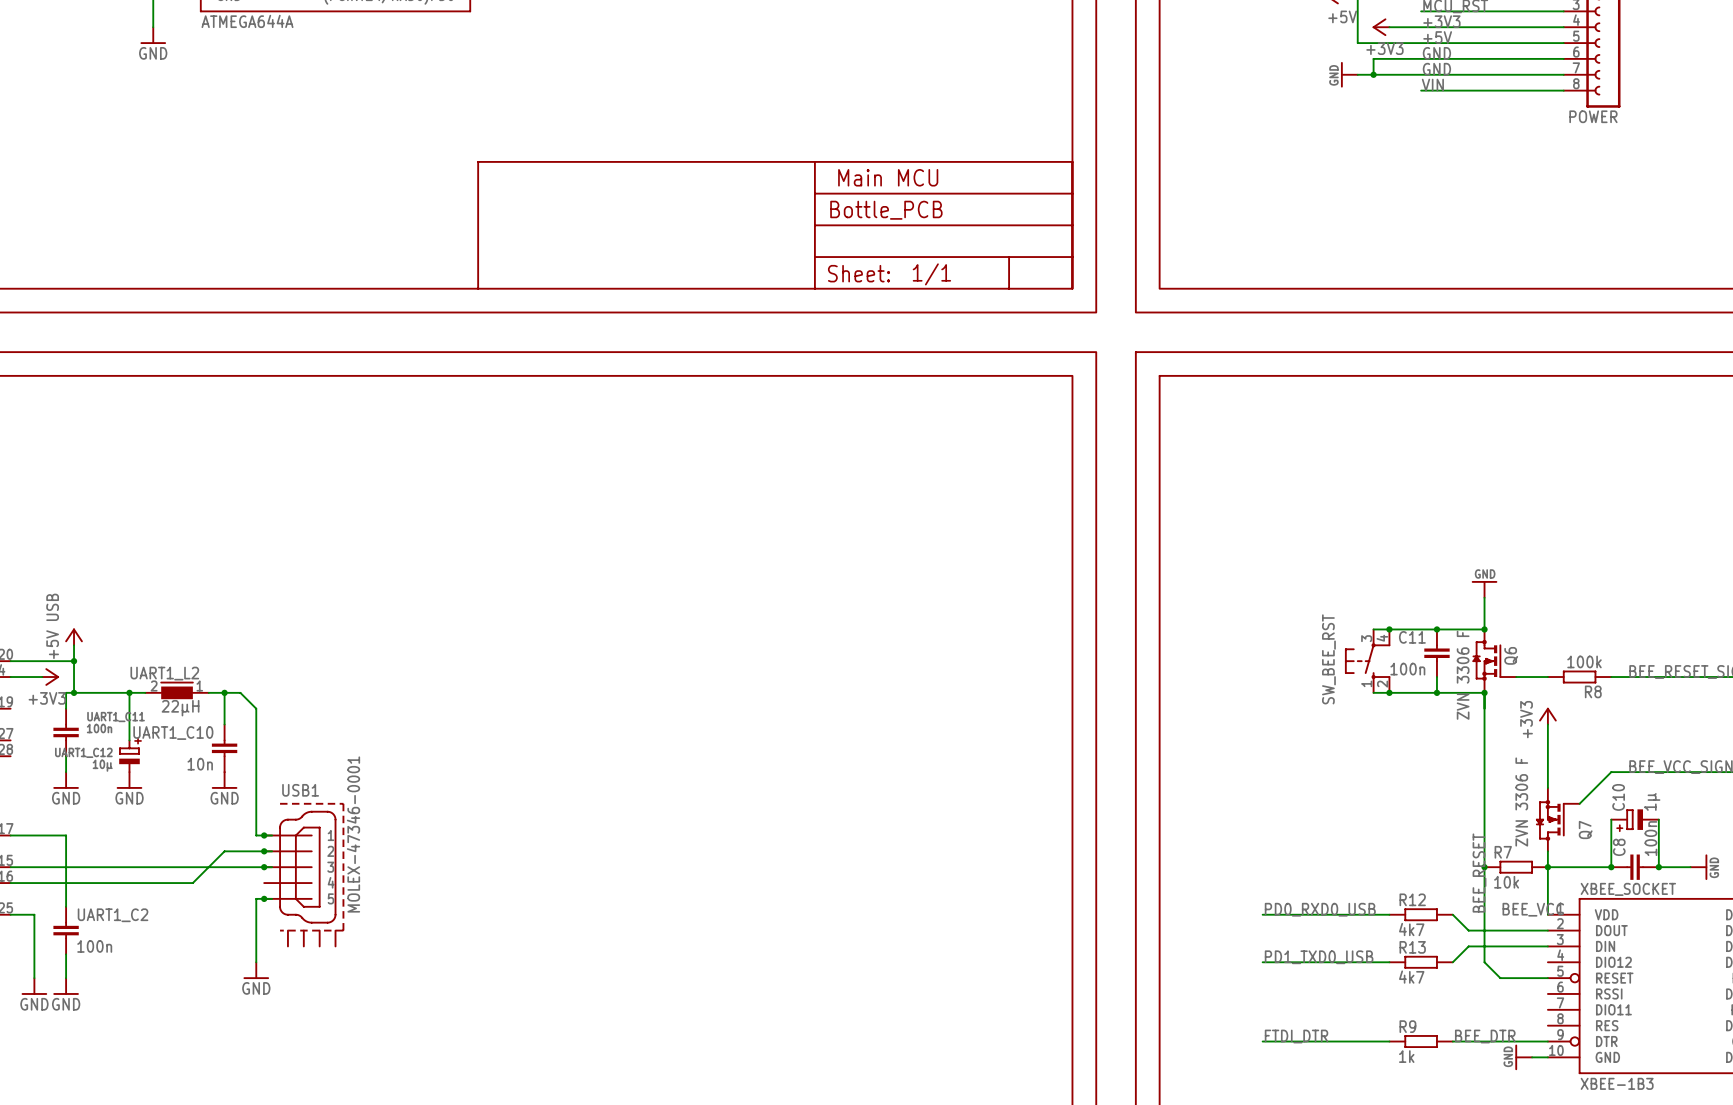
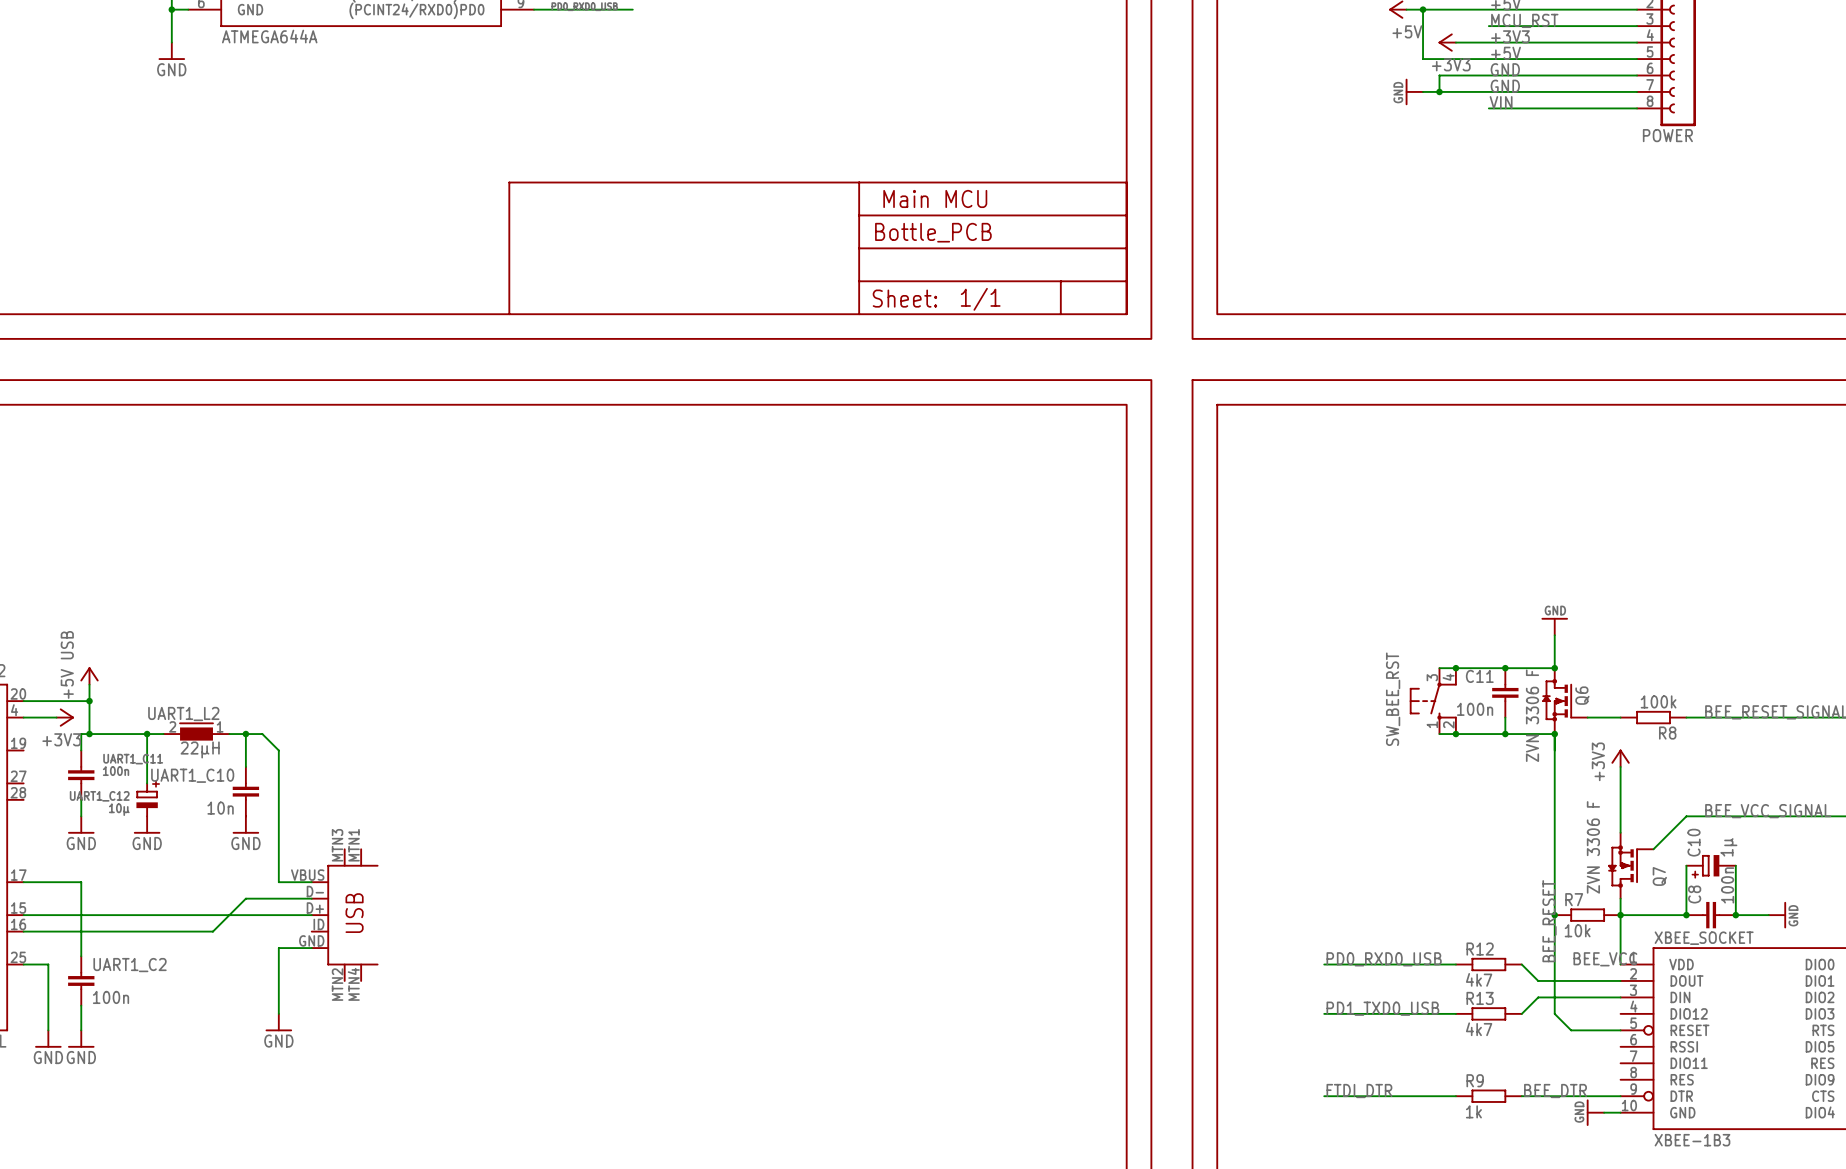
junction: (264, 835) -> none
junction: (264, 851) -> none
junction: (264, 867) -> none
part: none -> (345, 915)
USB1: MOLEX-47346-0001 (304, 874) -> none
junction: (264, 898) -> none

